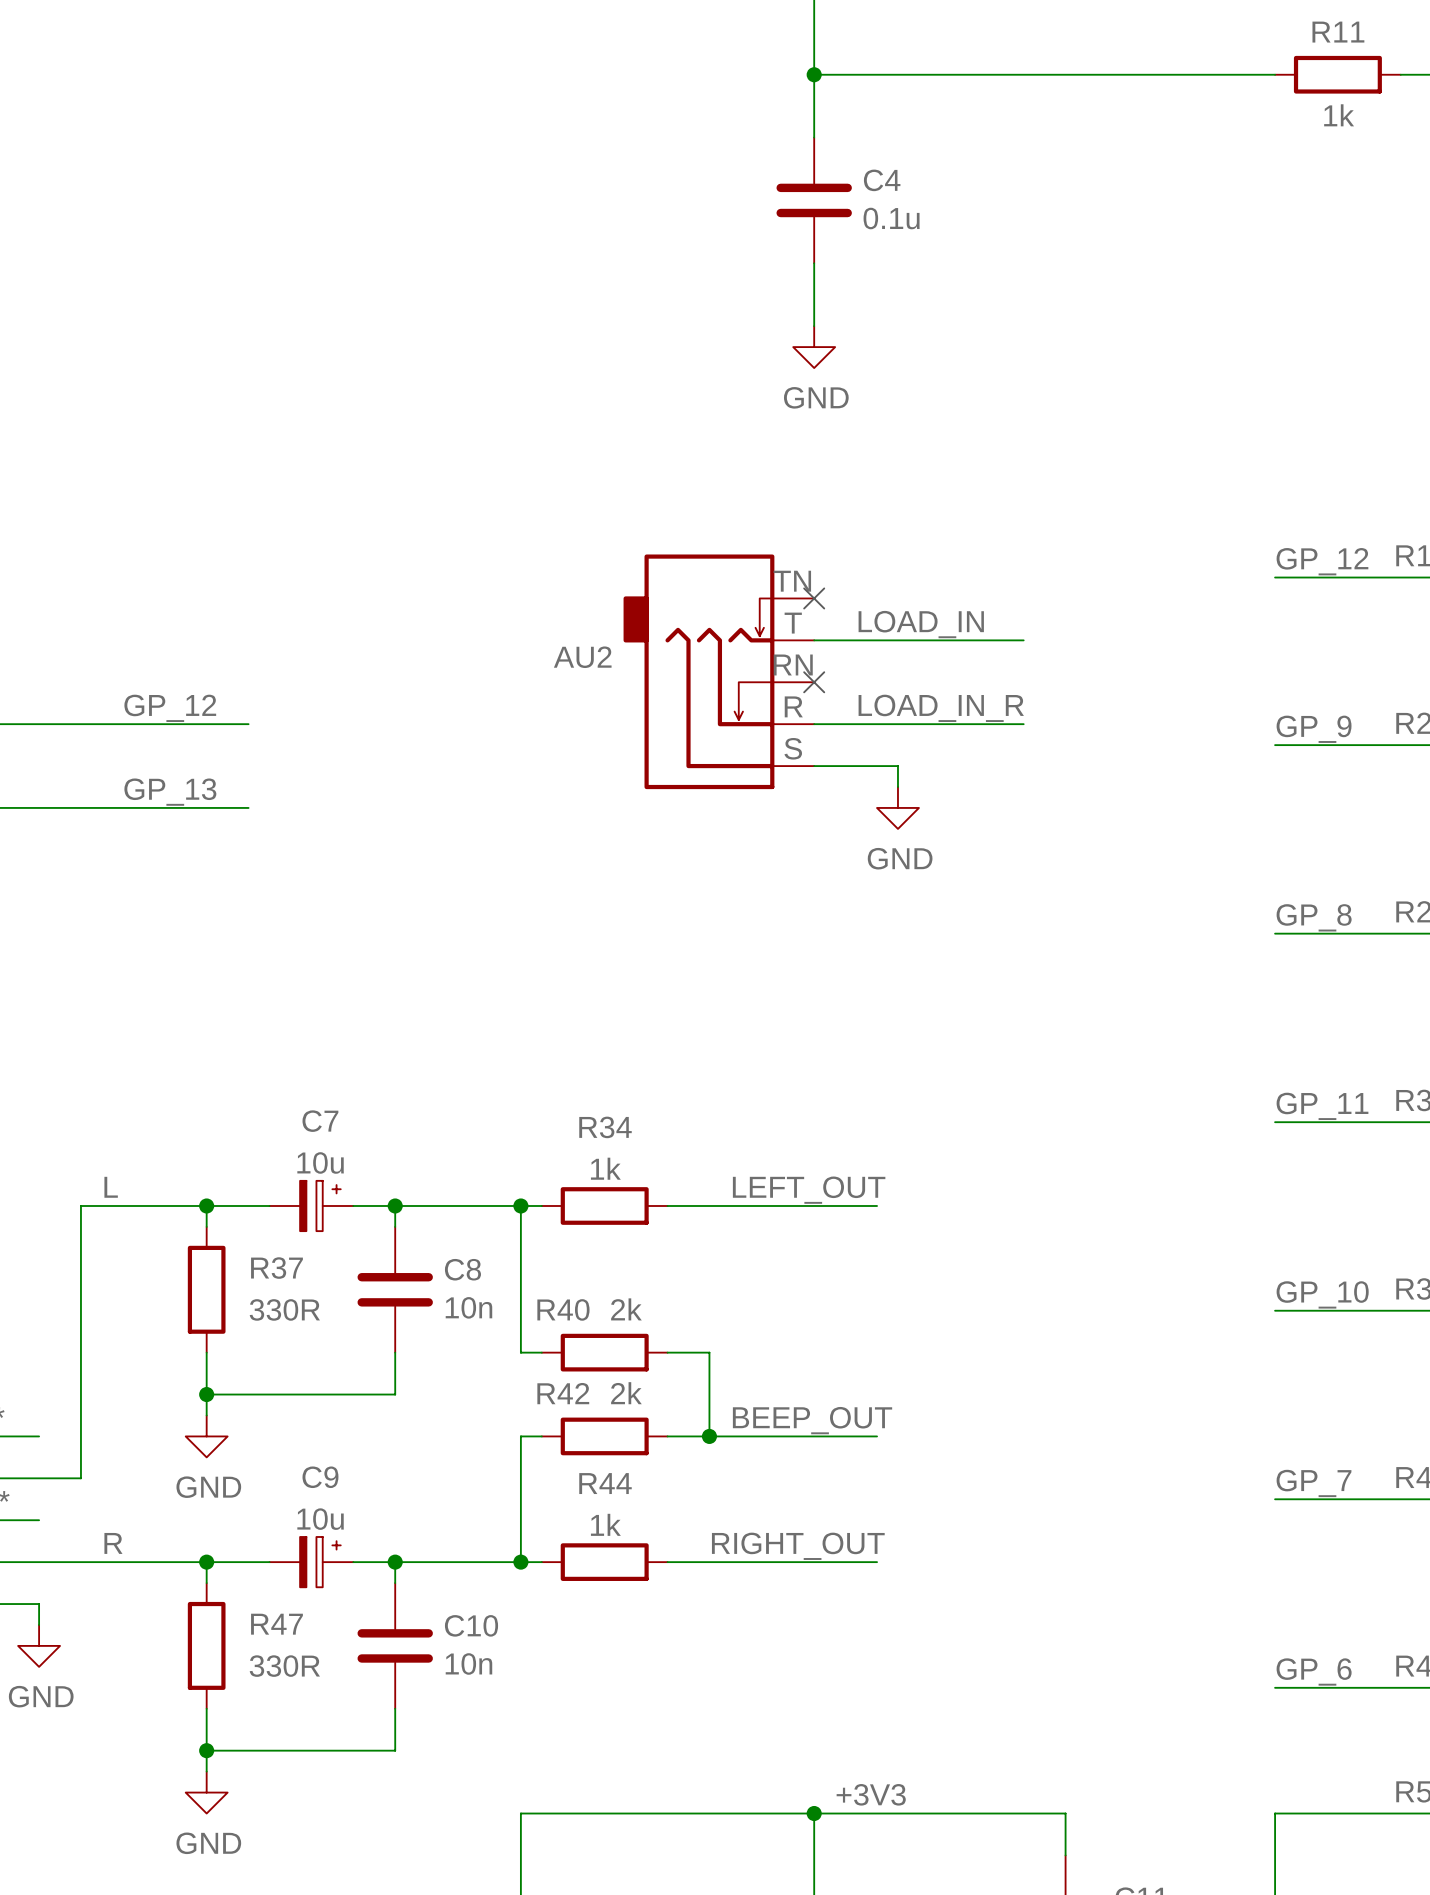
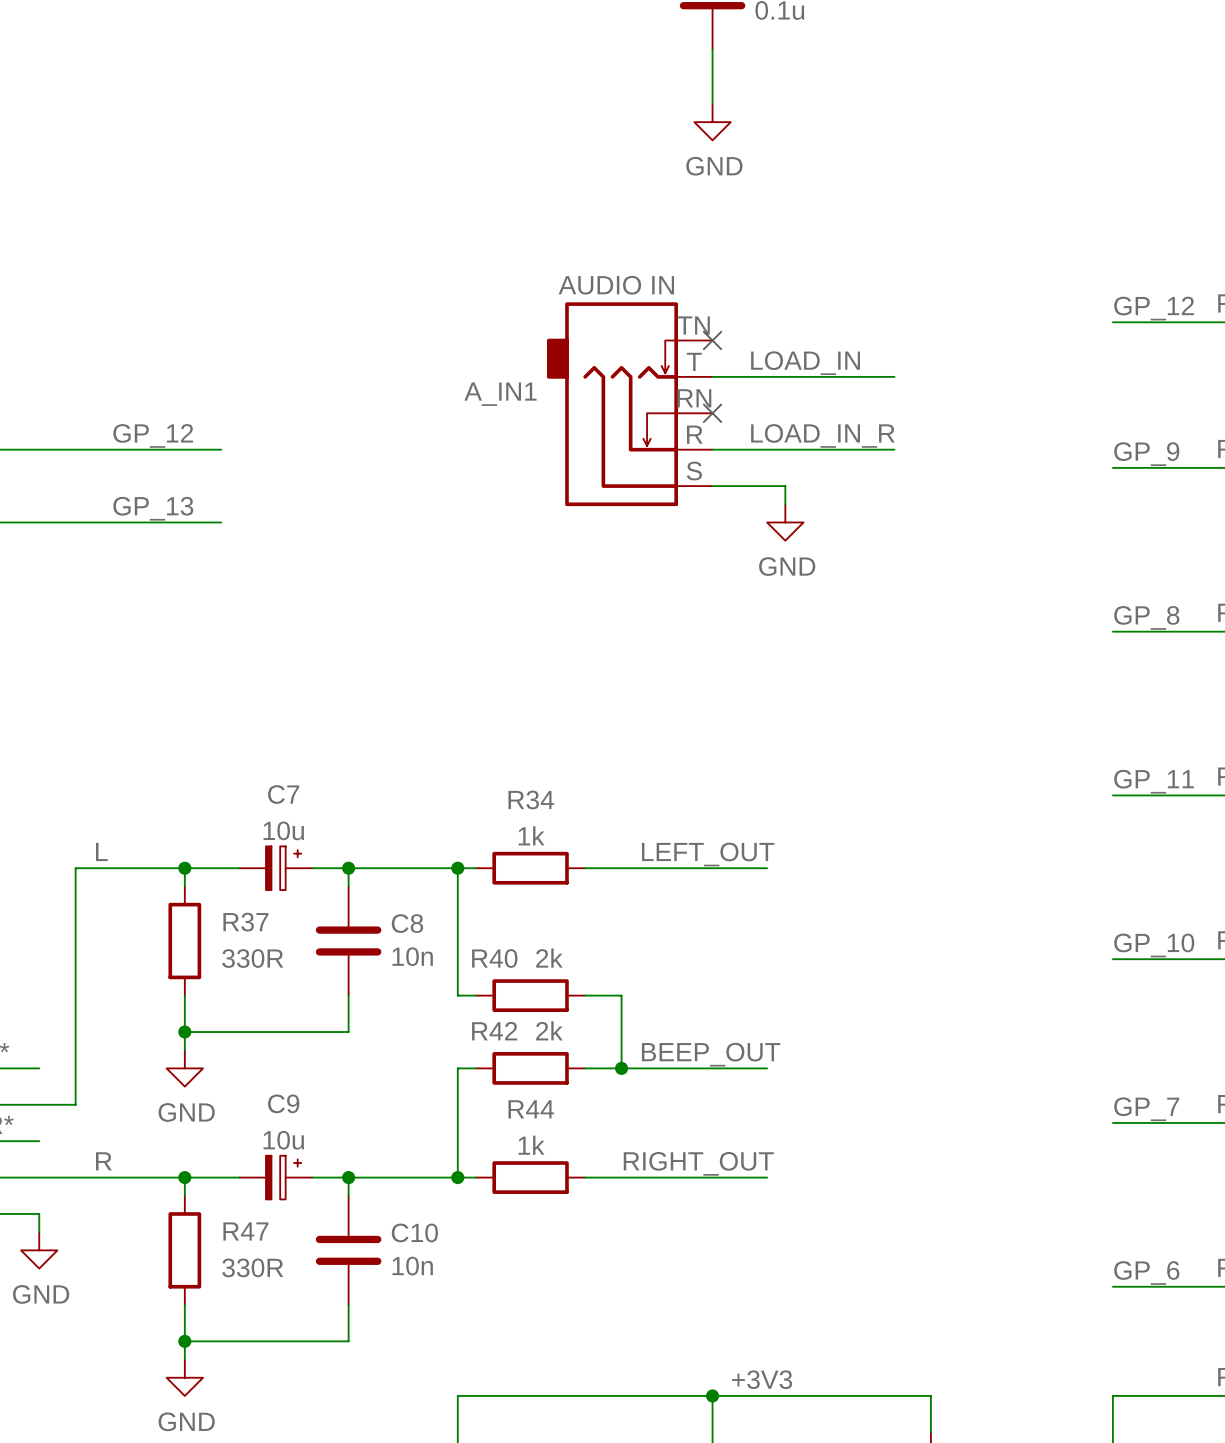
AU2 value: none -> AUDIO IN (616, 285)
AU2 name: AU2 (582, 657) -> A_IN1 (500, 394)

